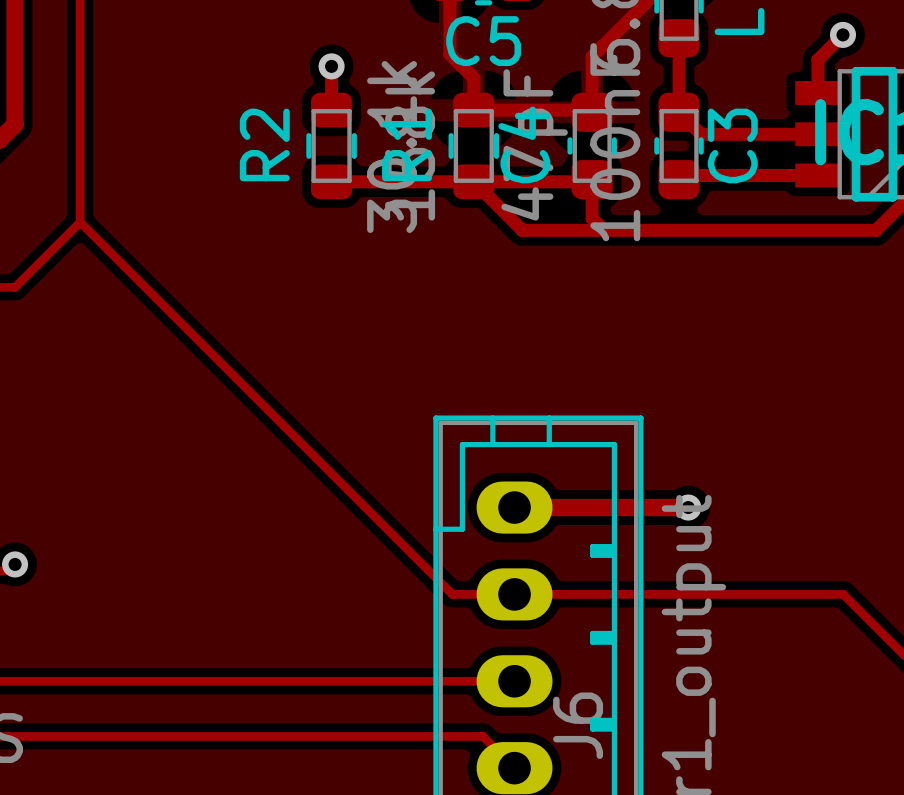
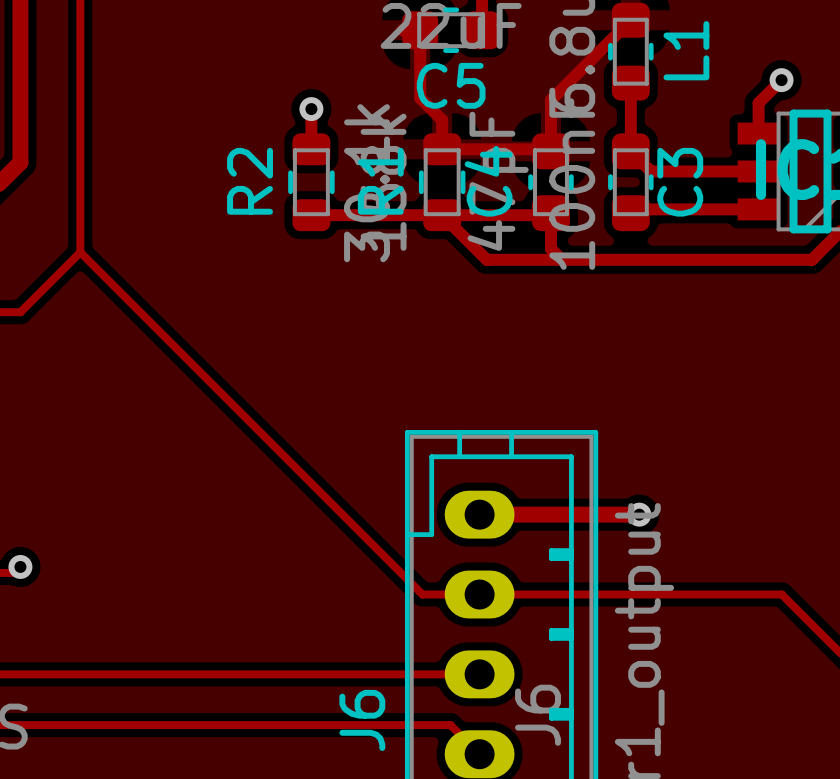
text: none -> J6 (362, 720)

